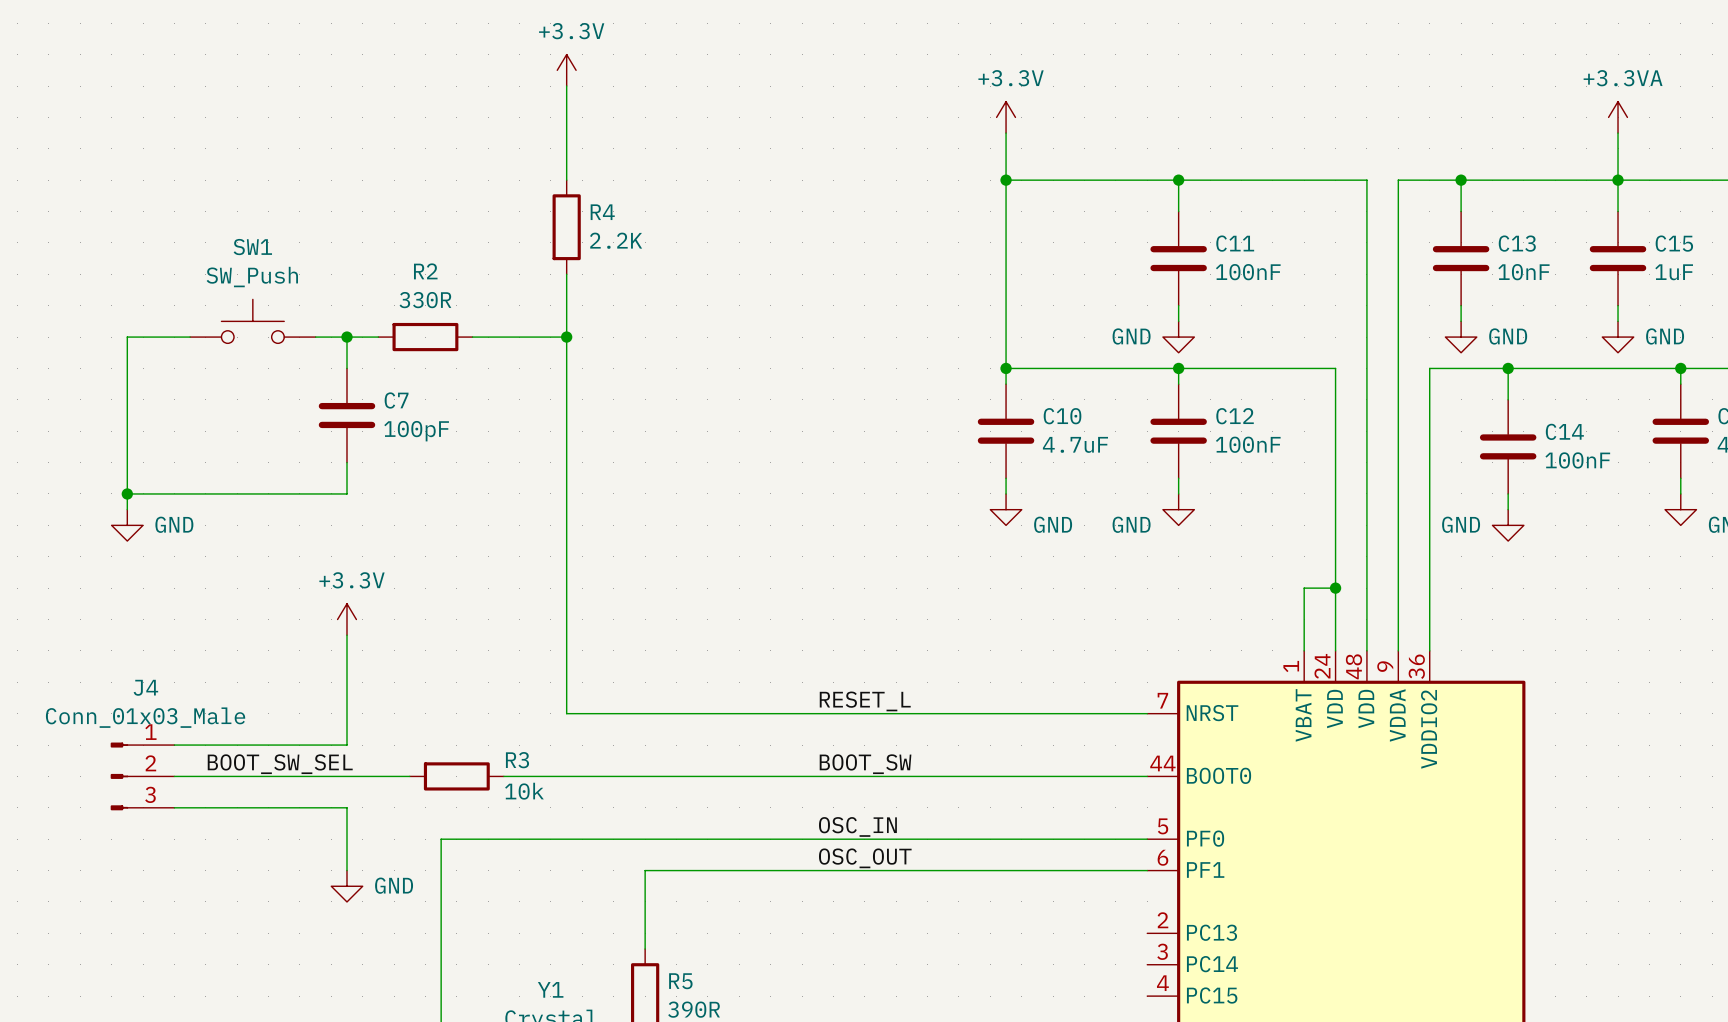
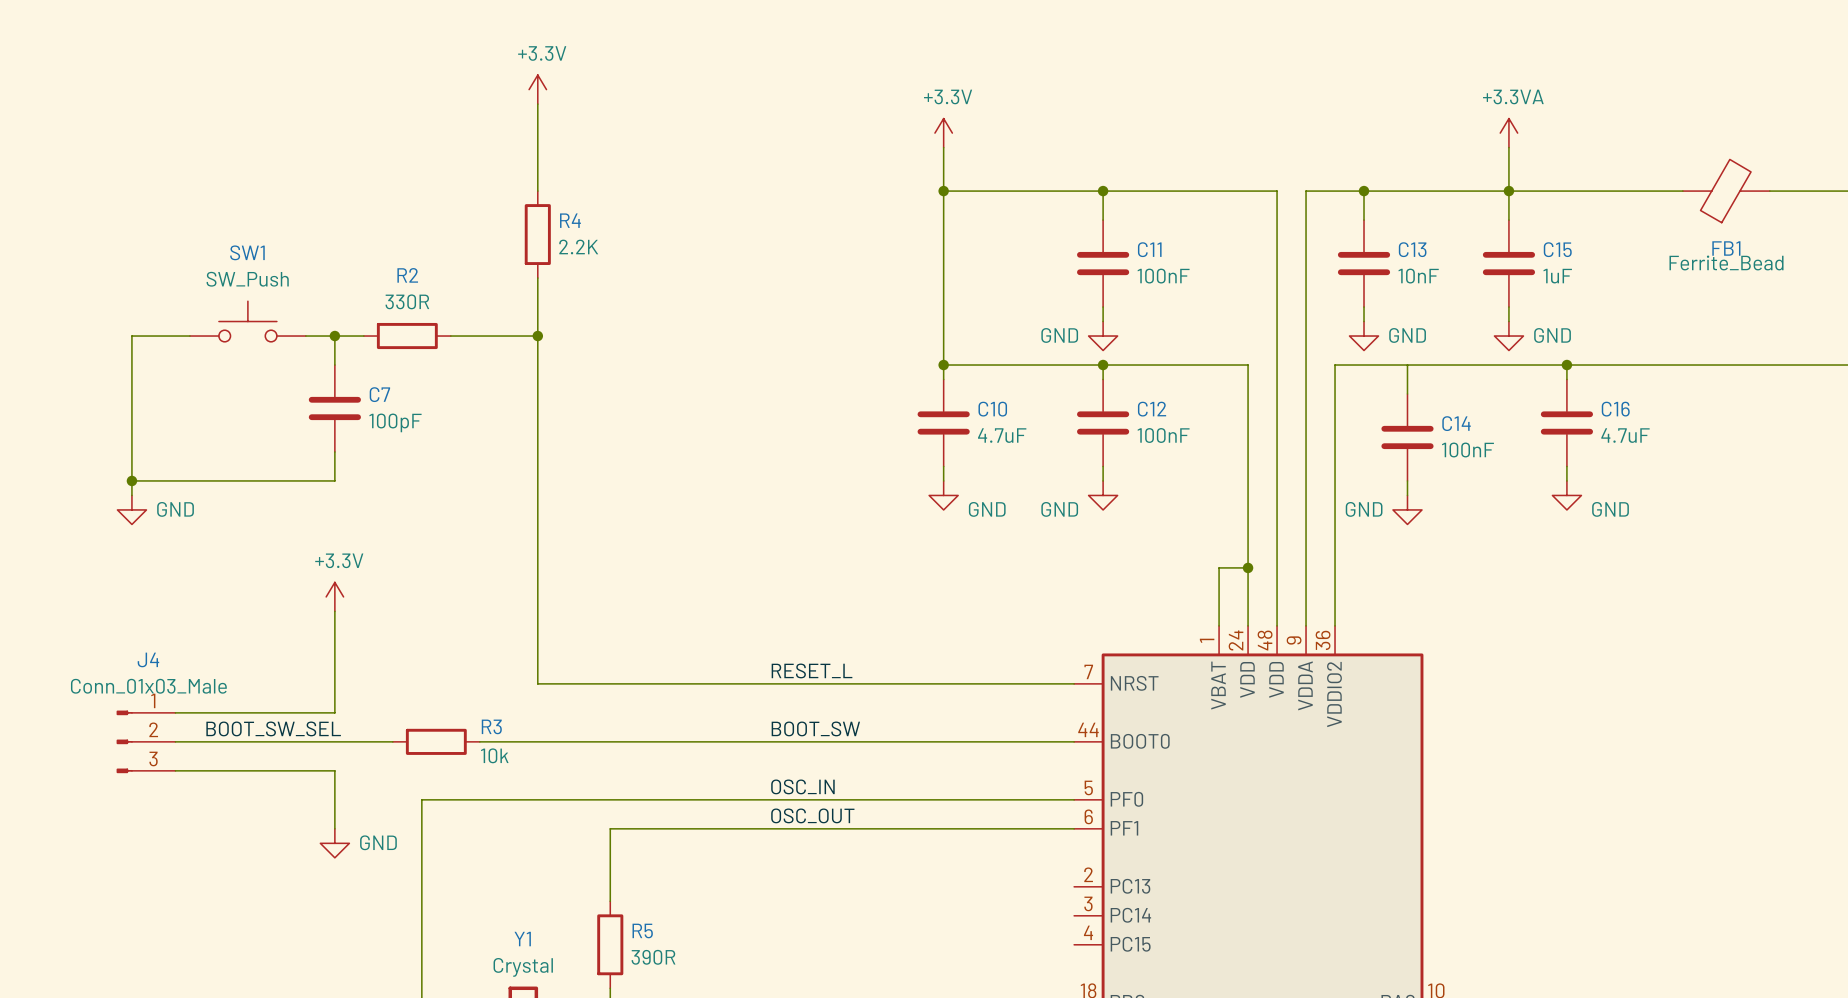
junction: (1508, 368) -> none

